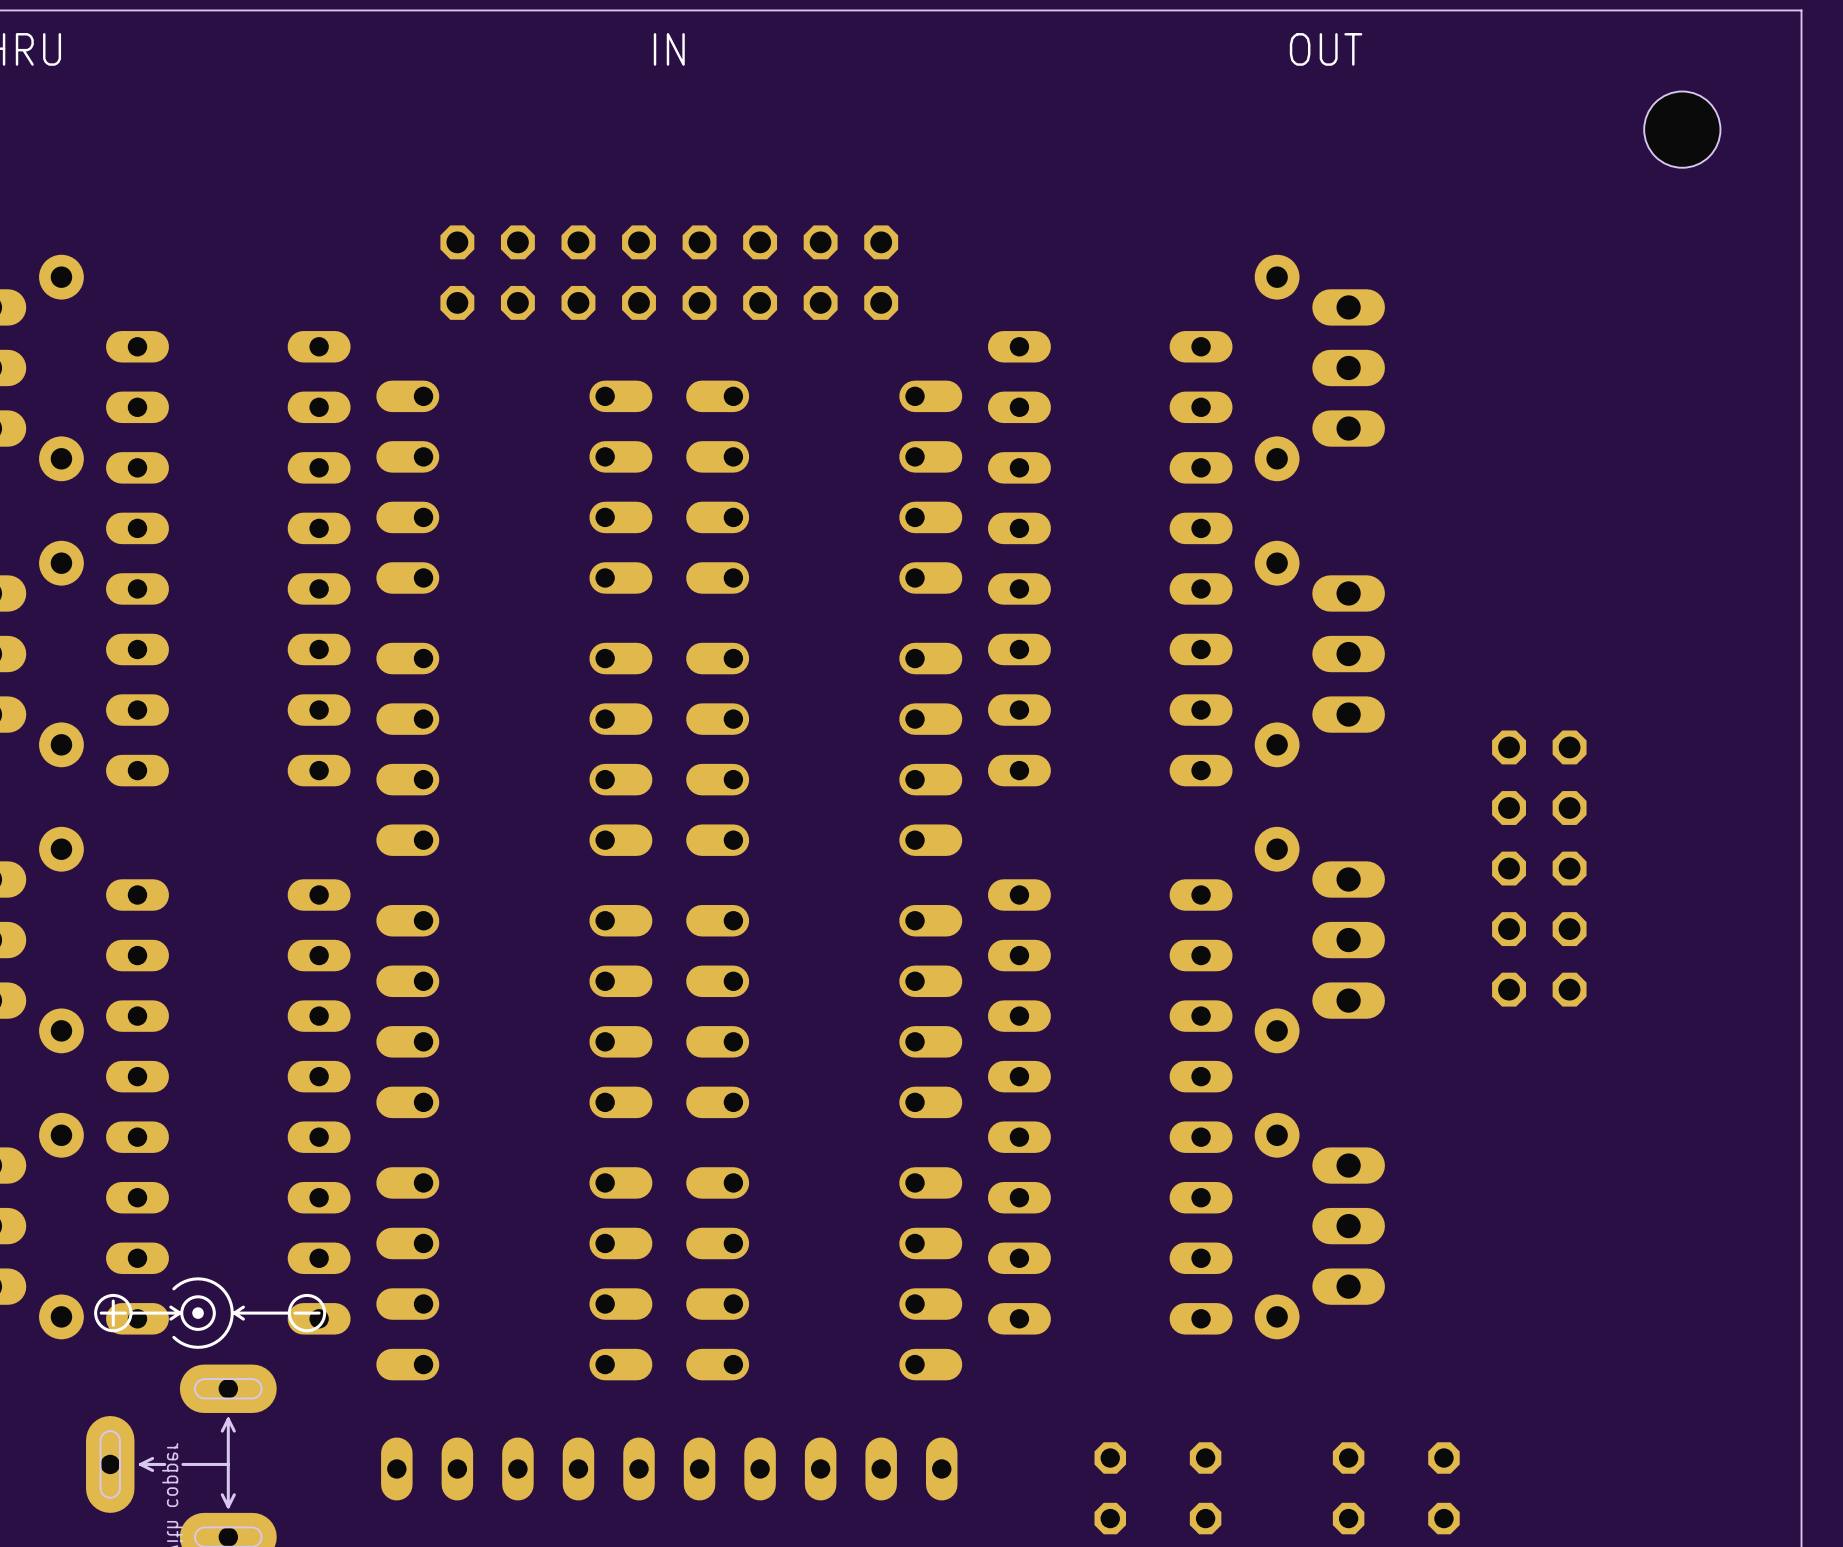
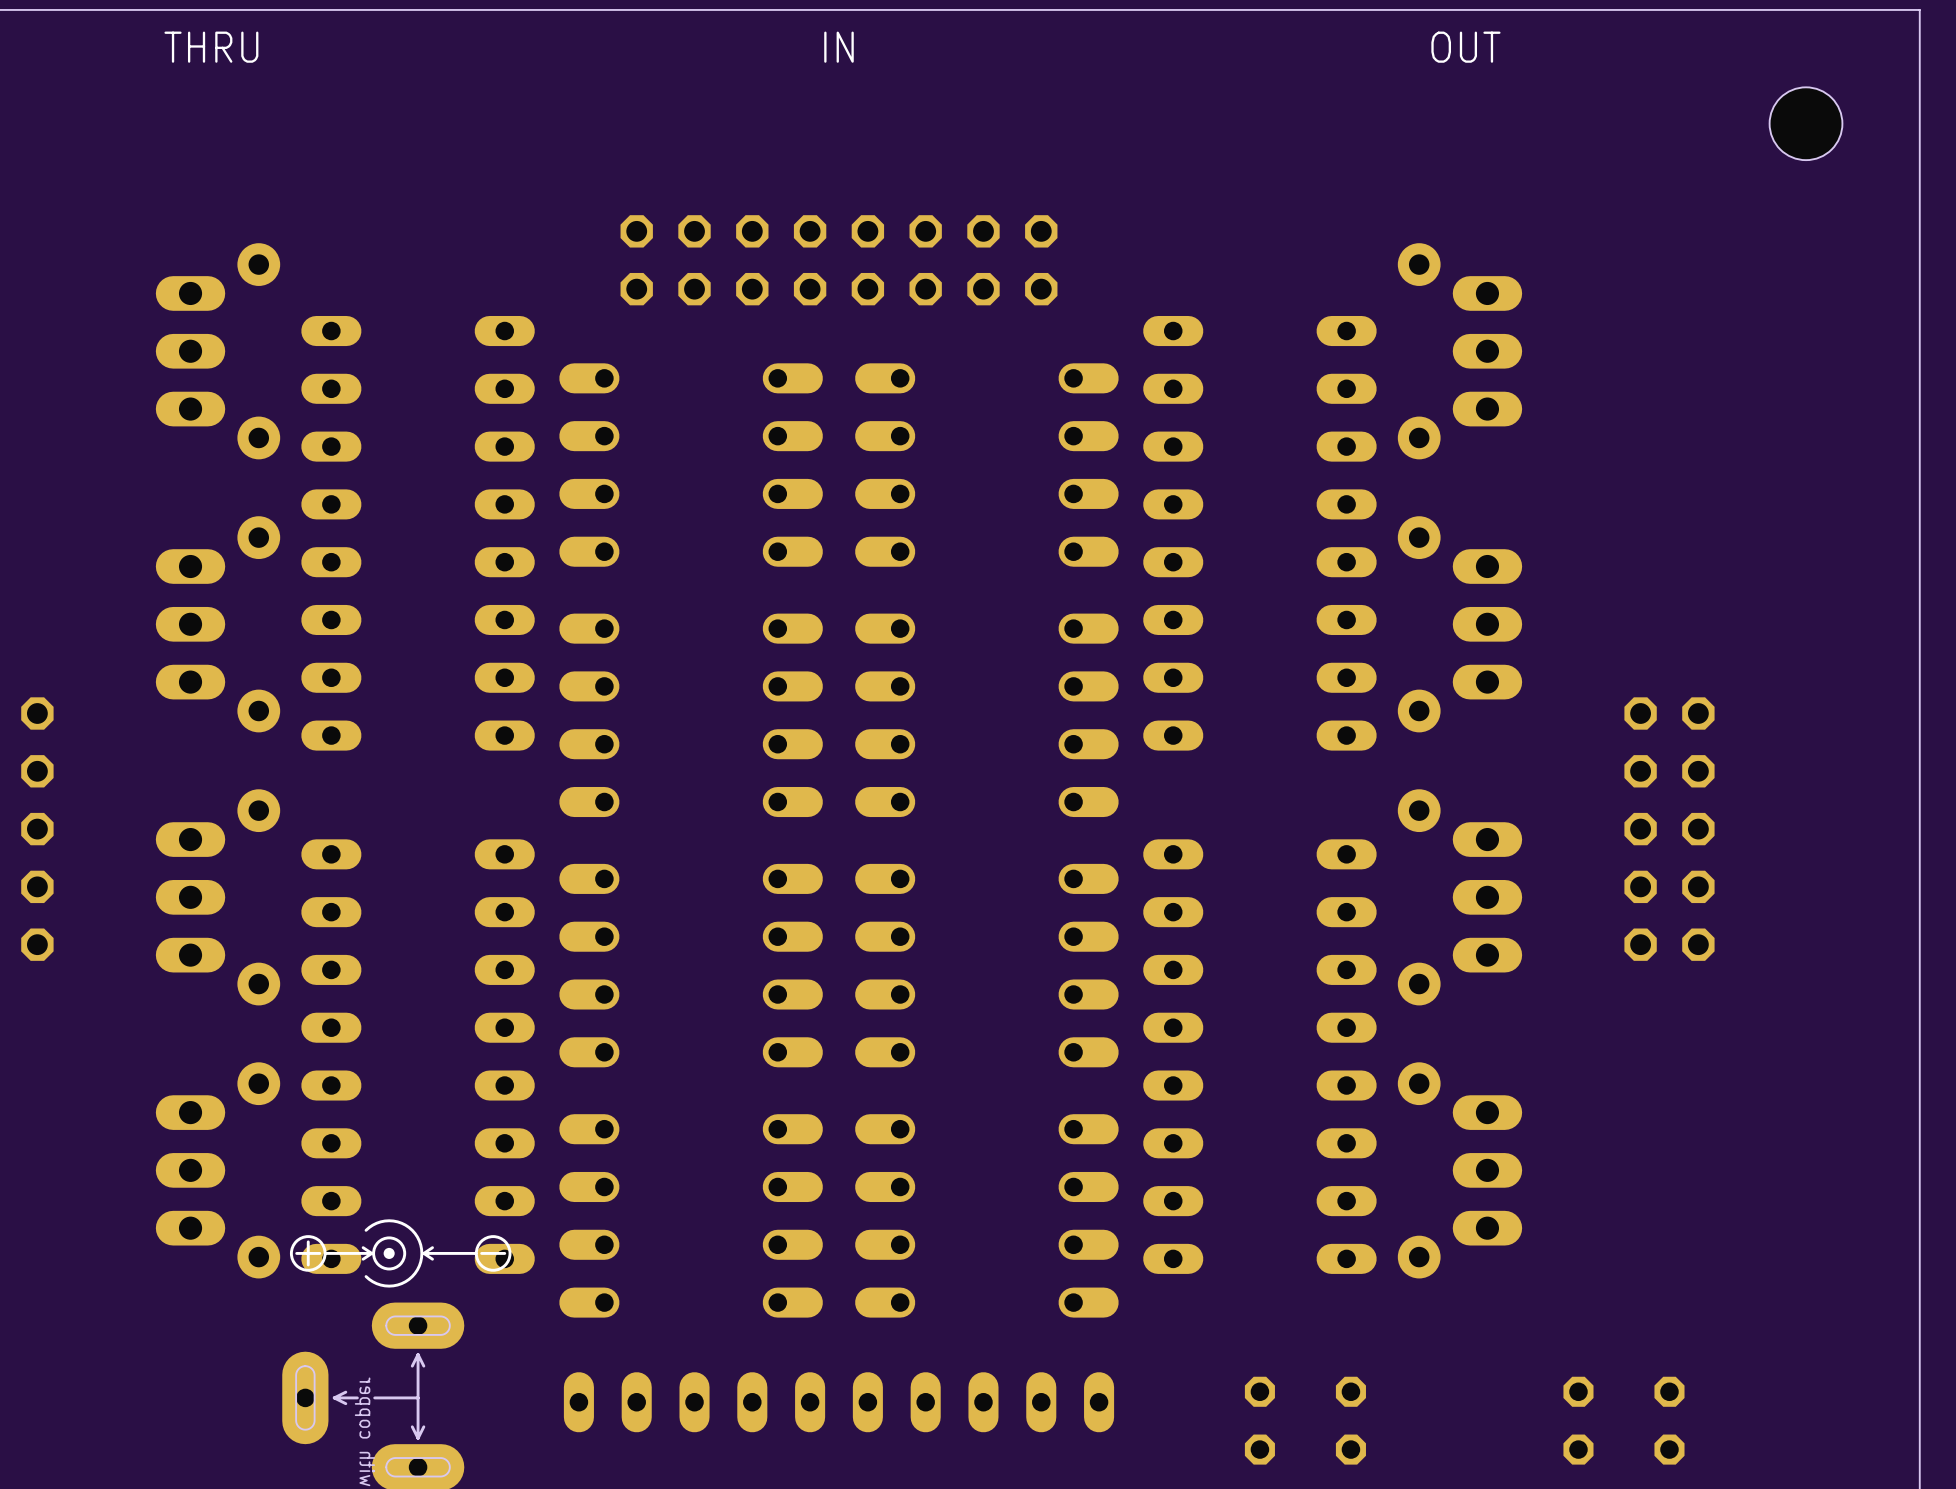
part position: (1348, 1488) -> (1669, 1420)

